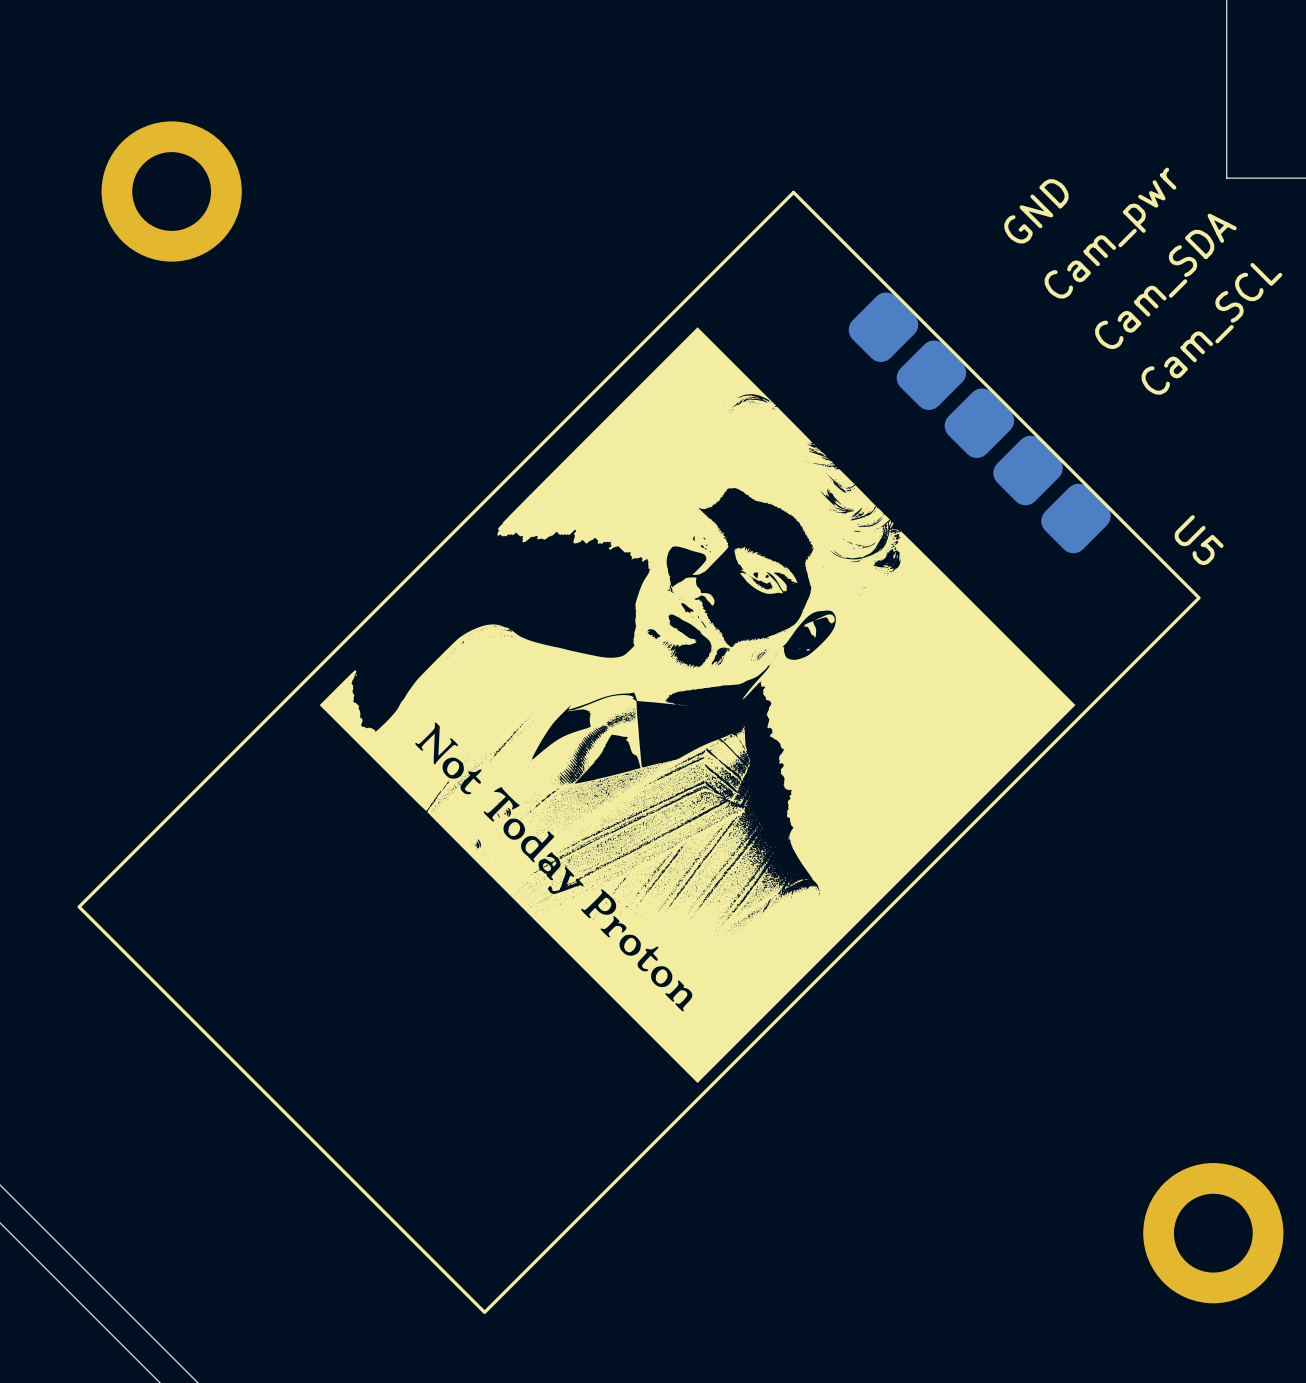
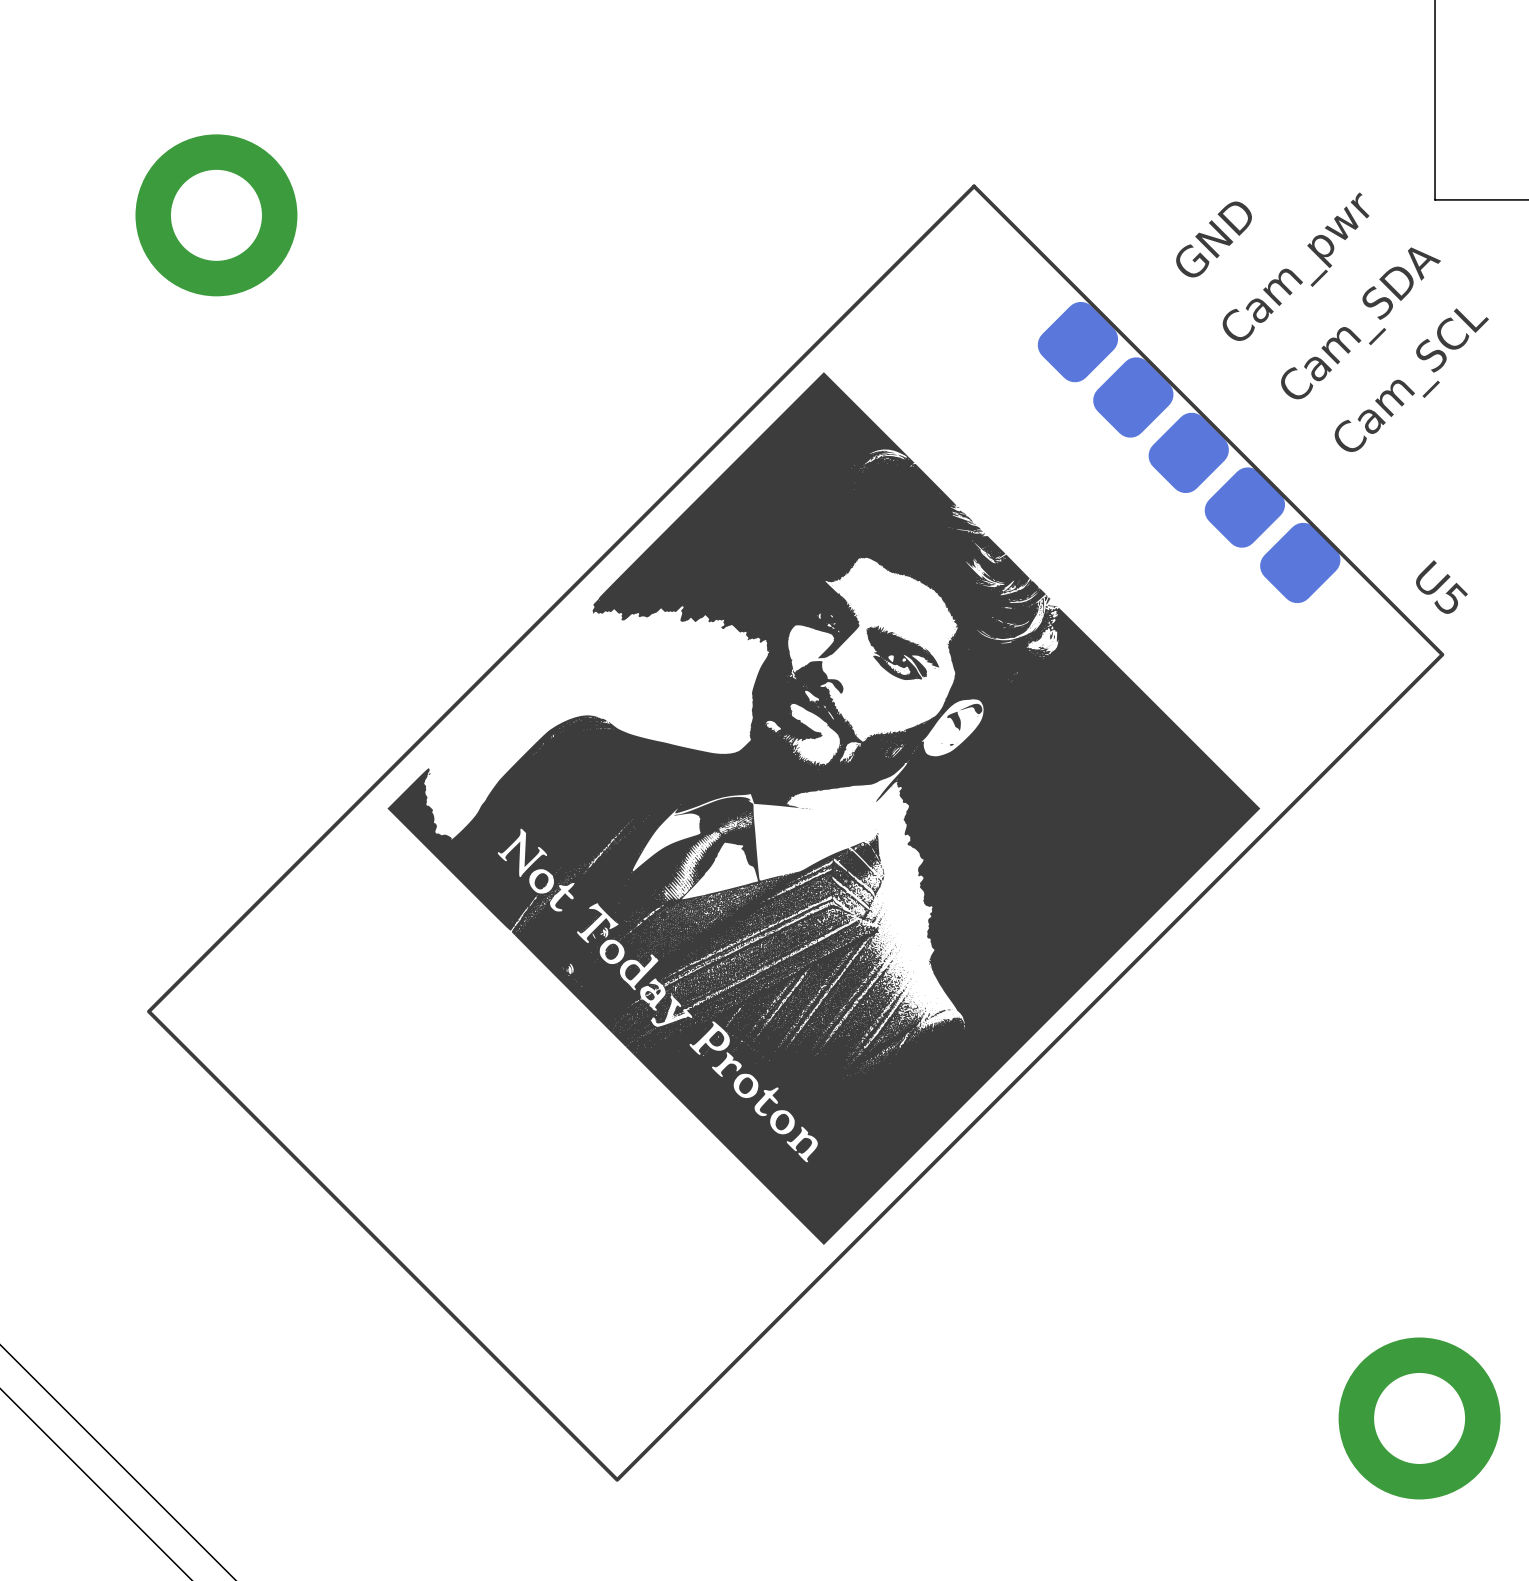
U5 position: (639, 752) -> (795, 833)

